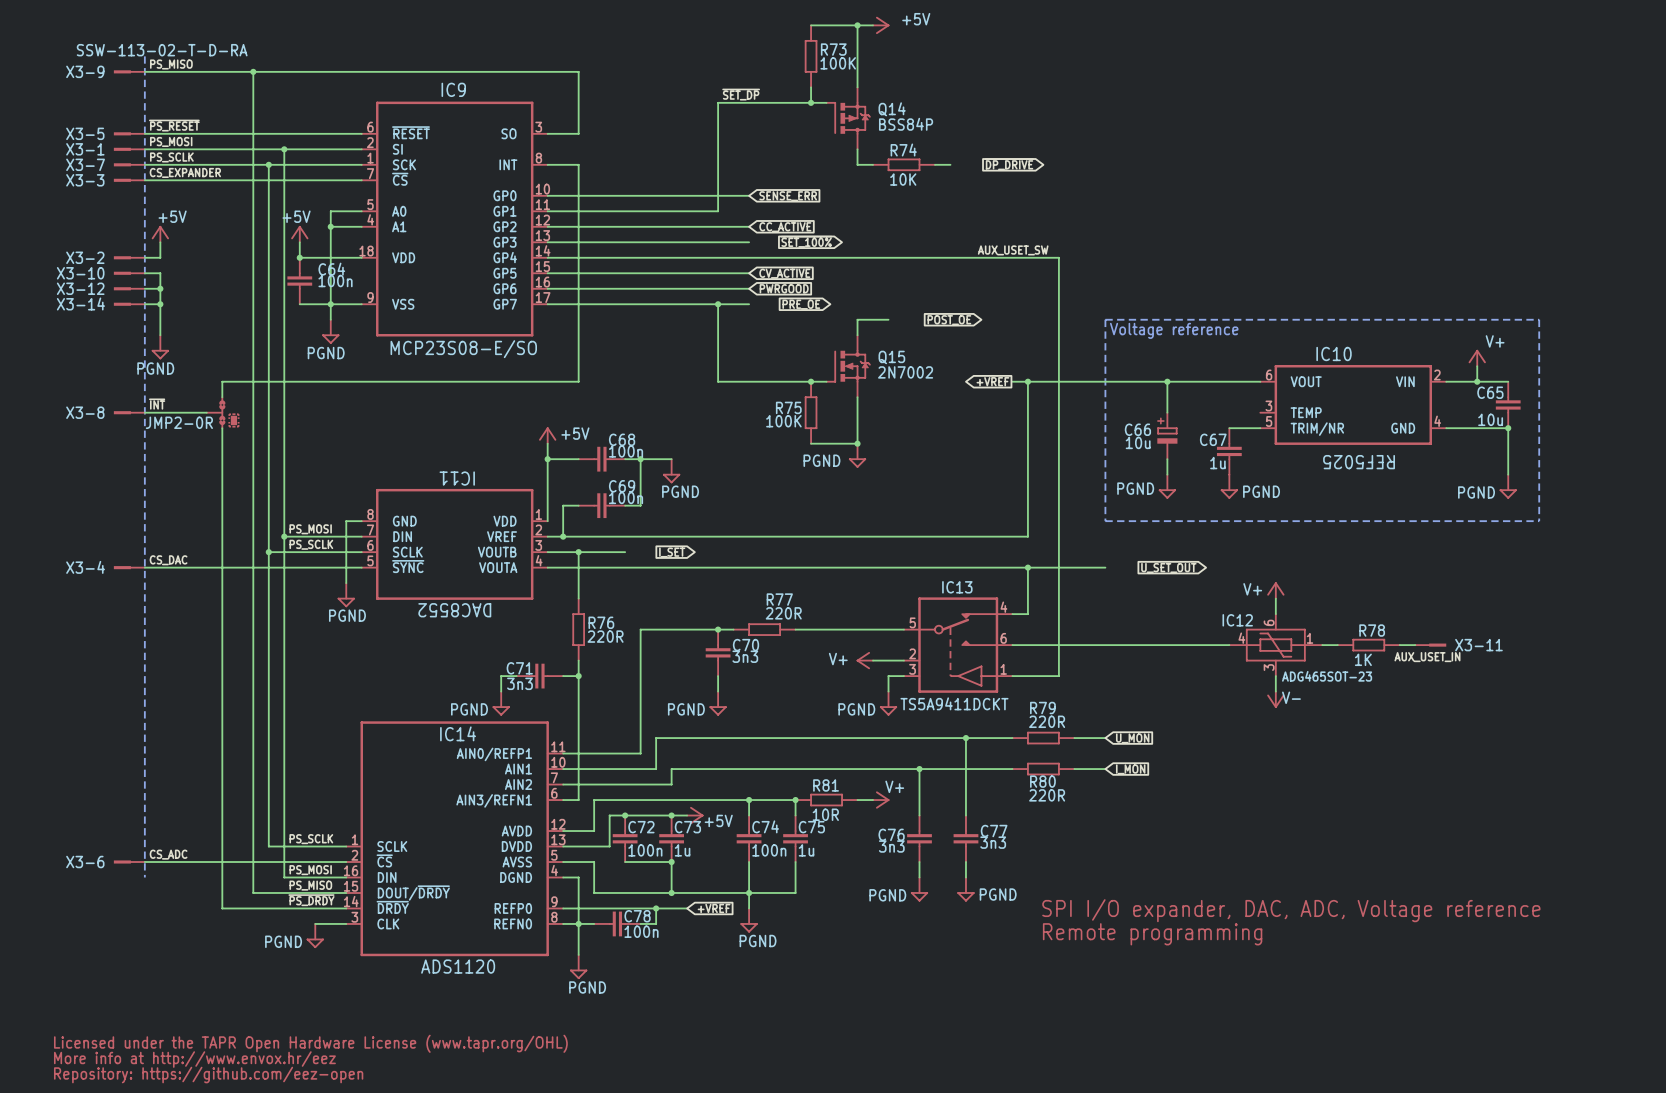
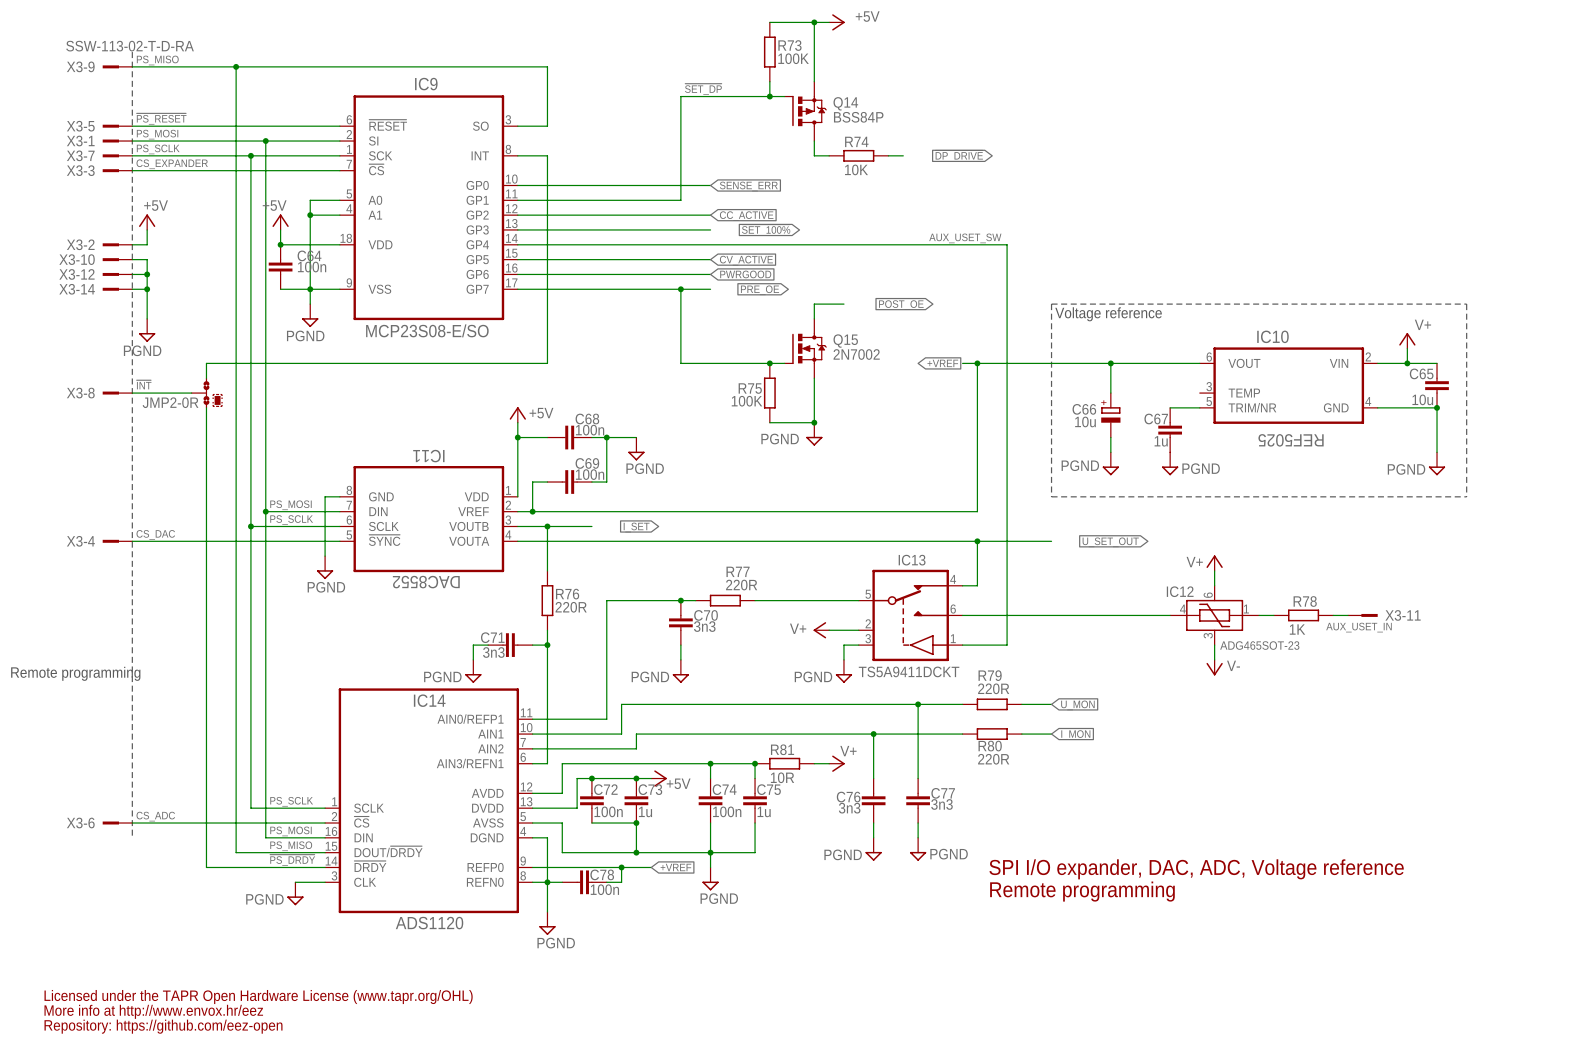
text: none -> Remote programming (75, 673)

